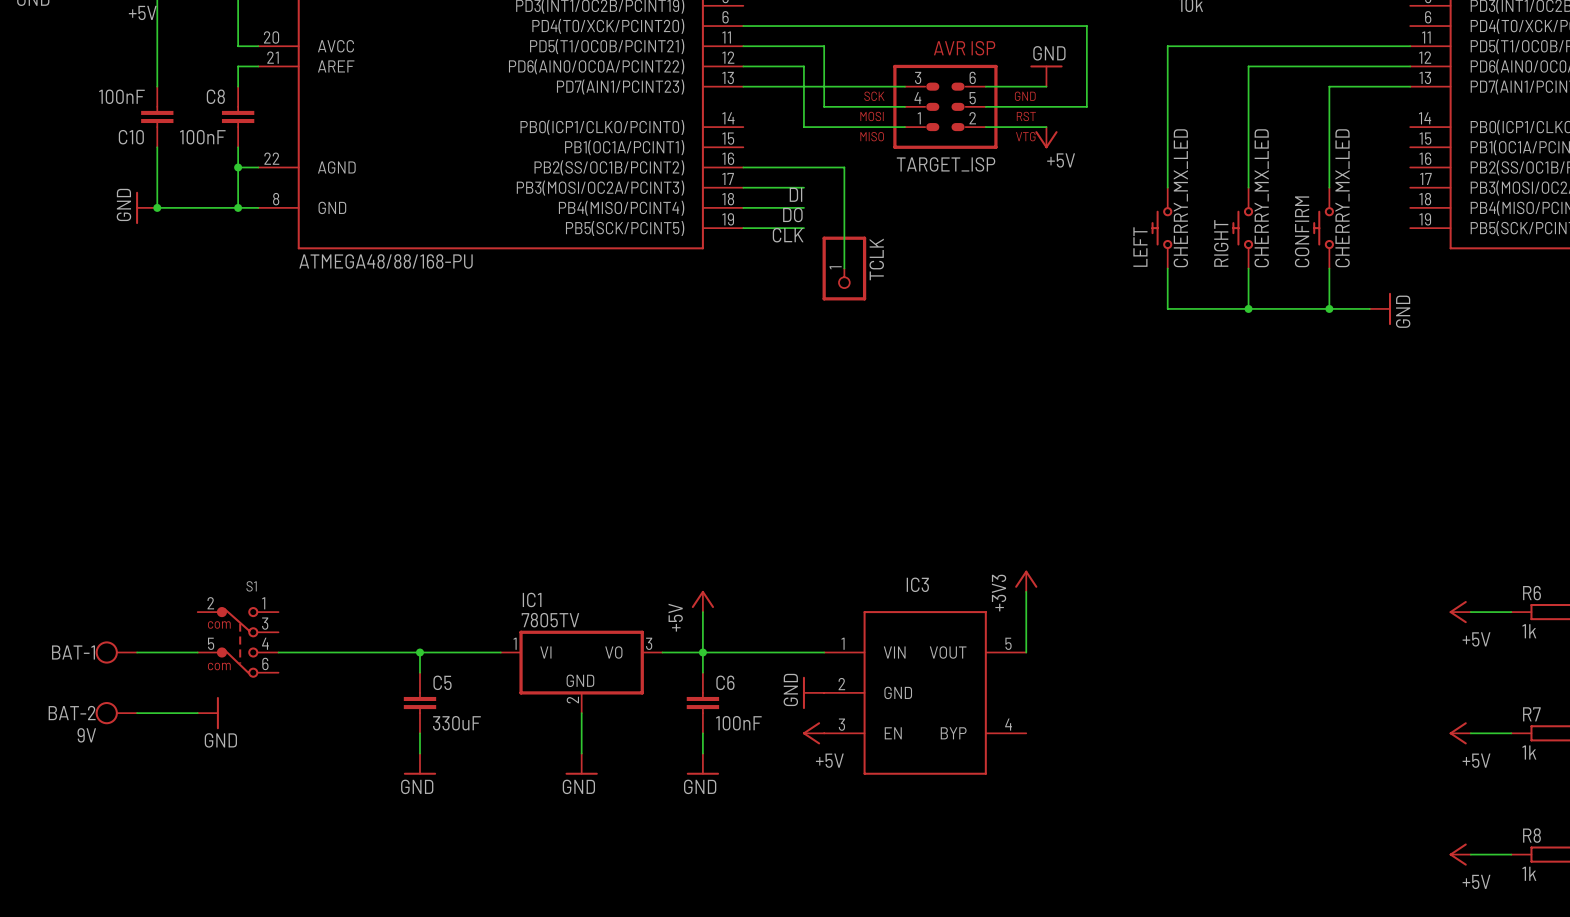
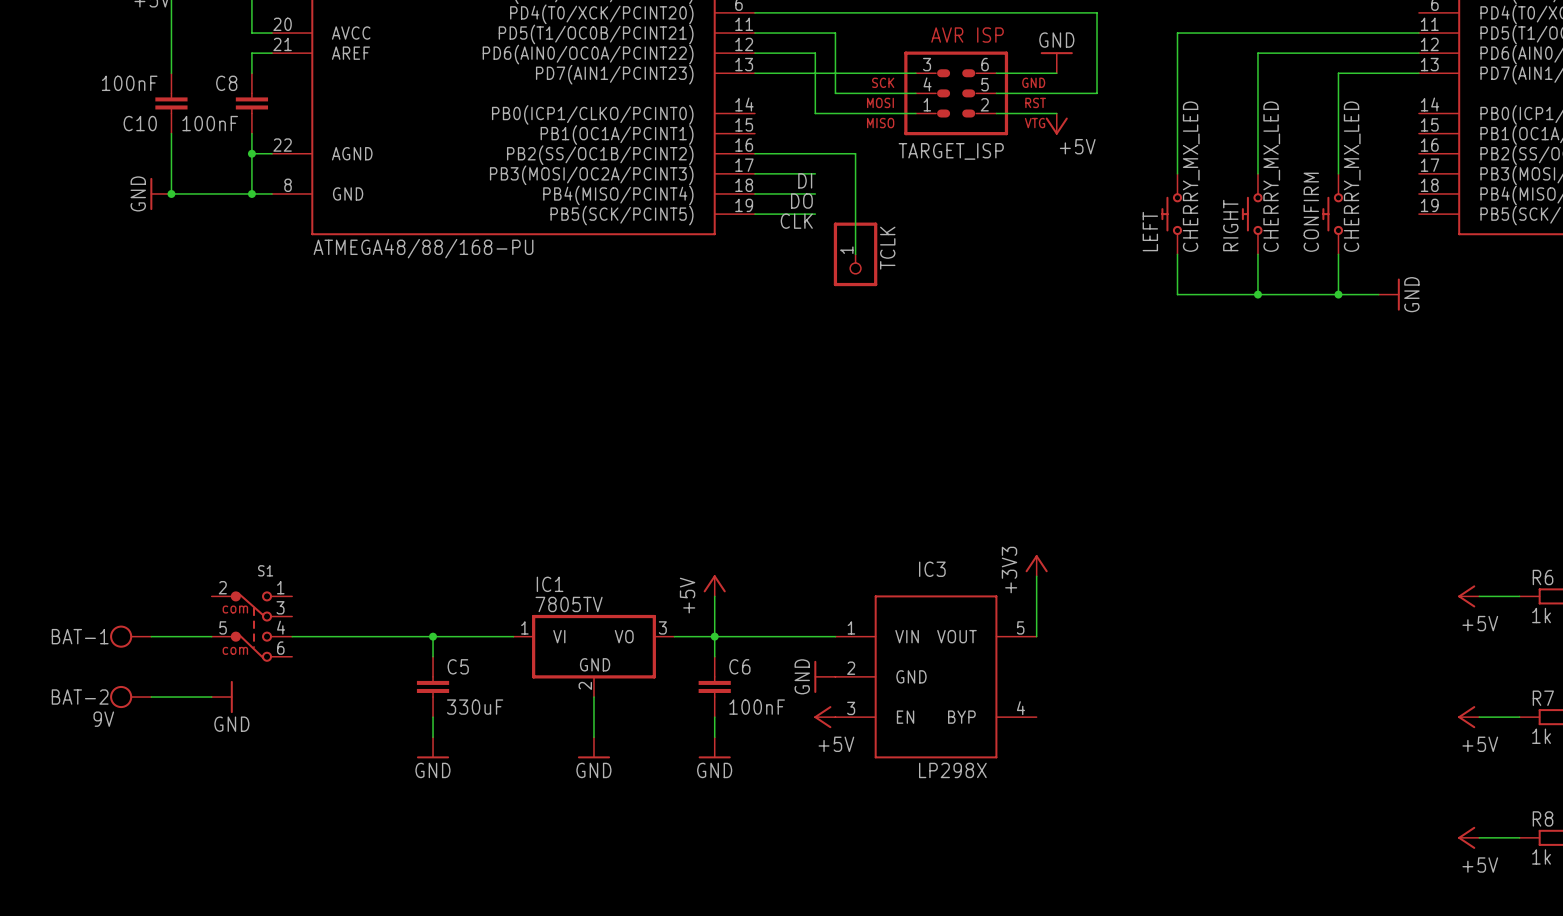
IC3 text: none -> LP298X (952, 770)

